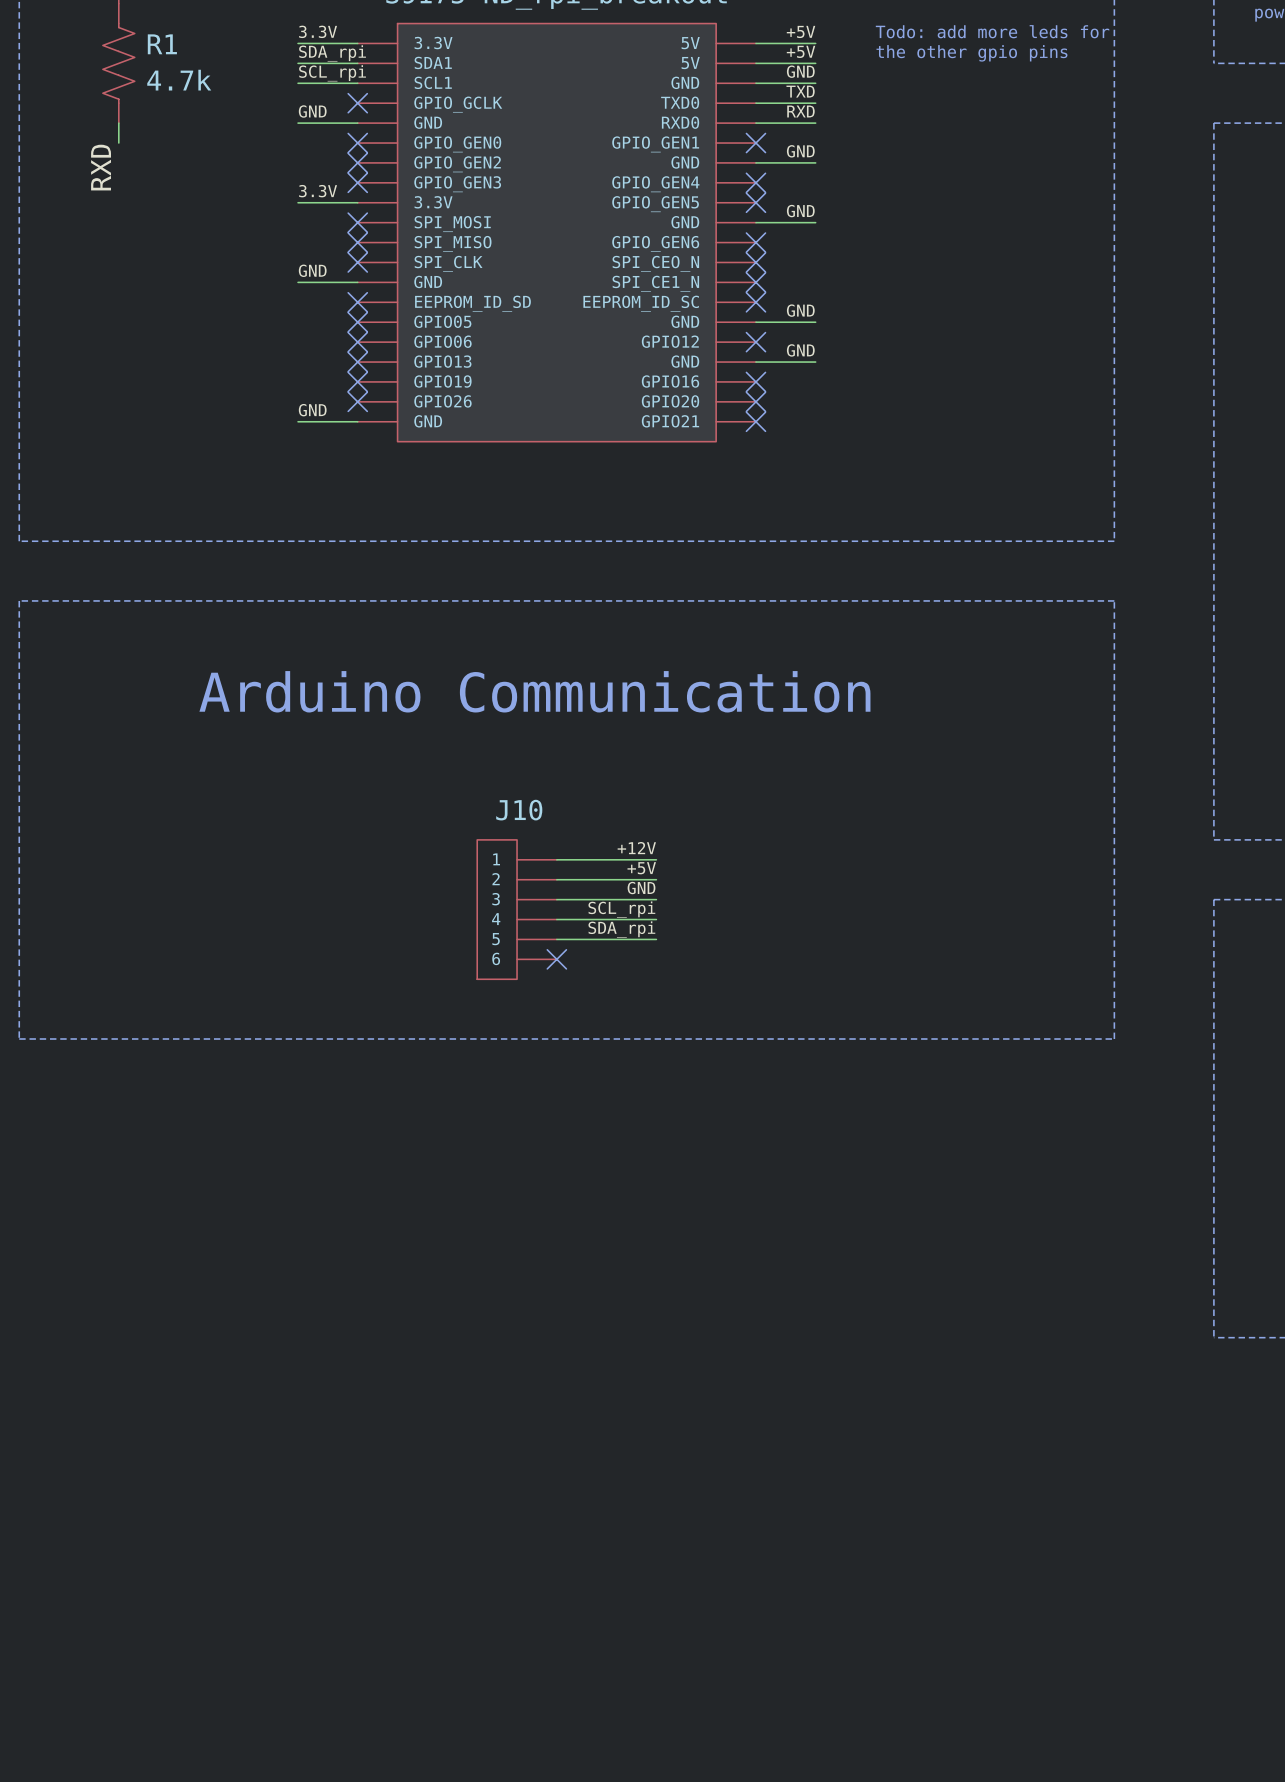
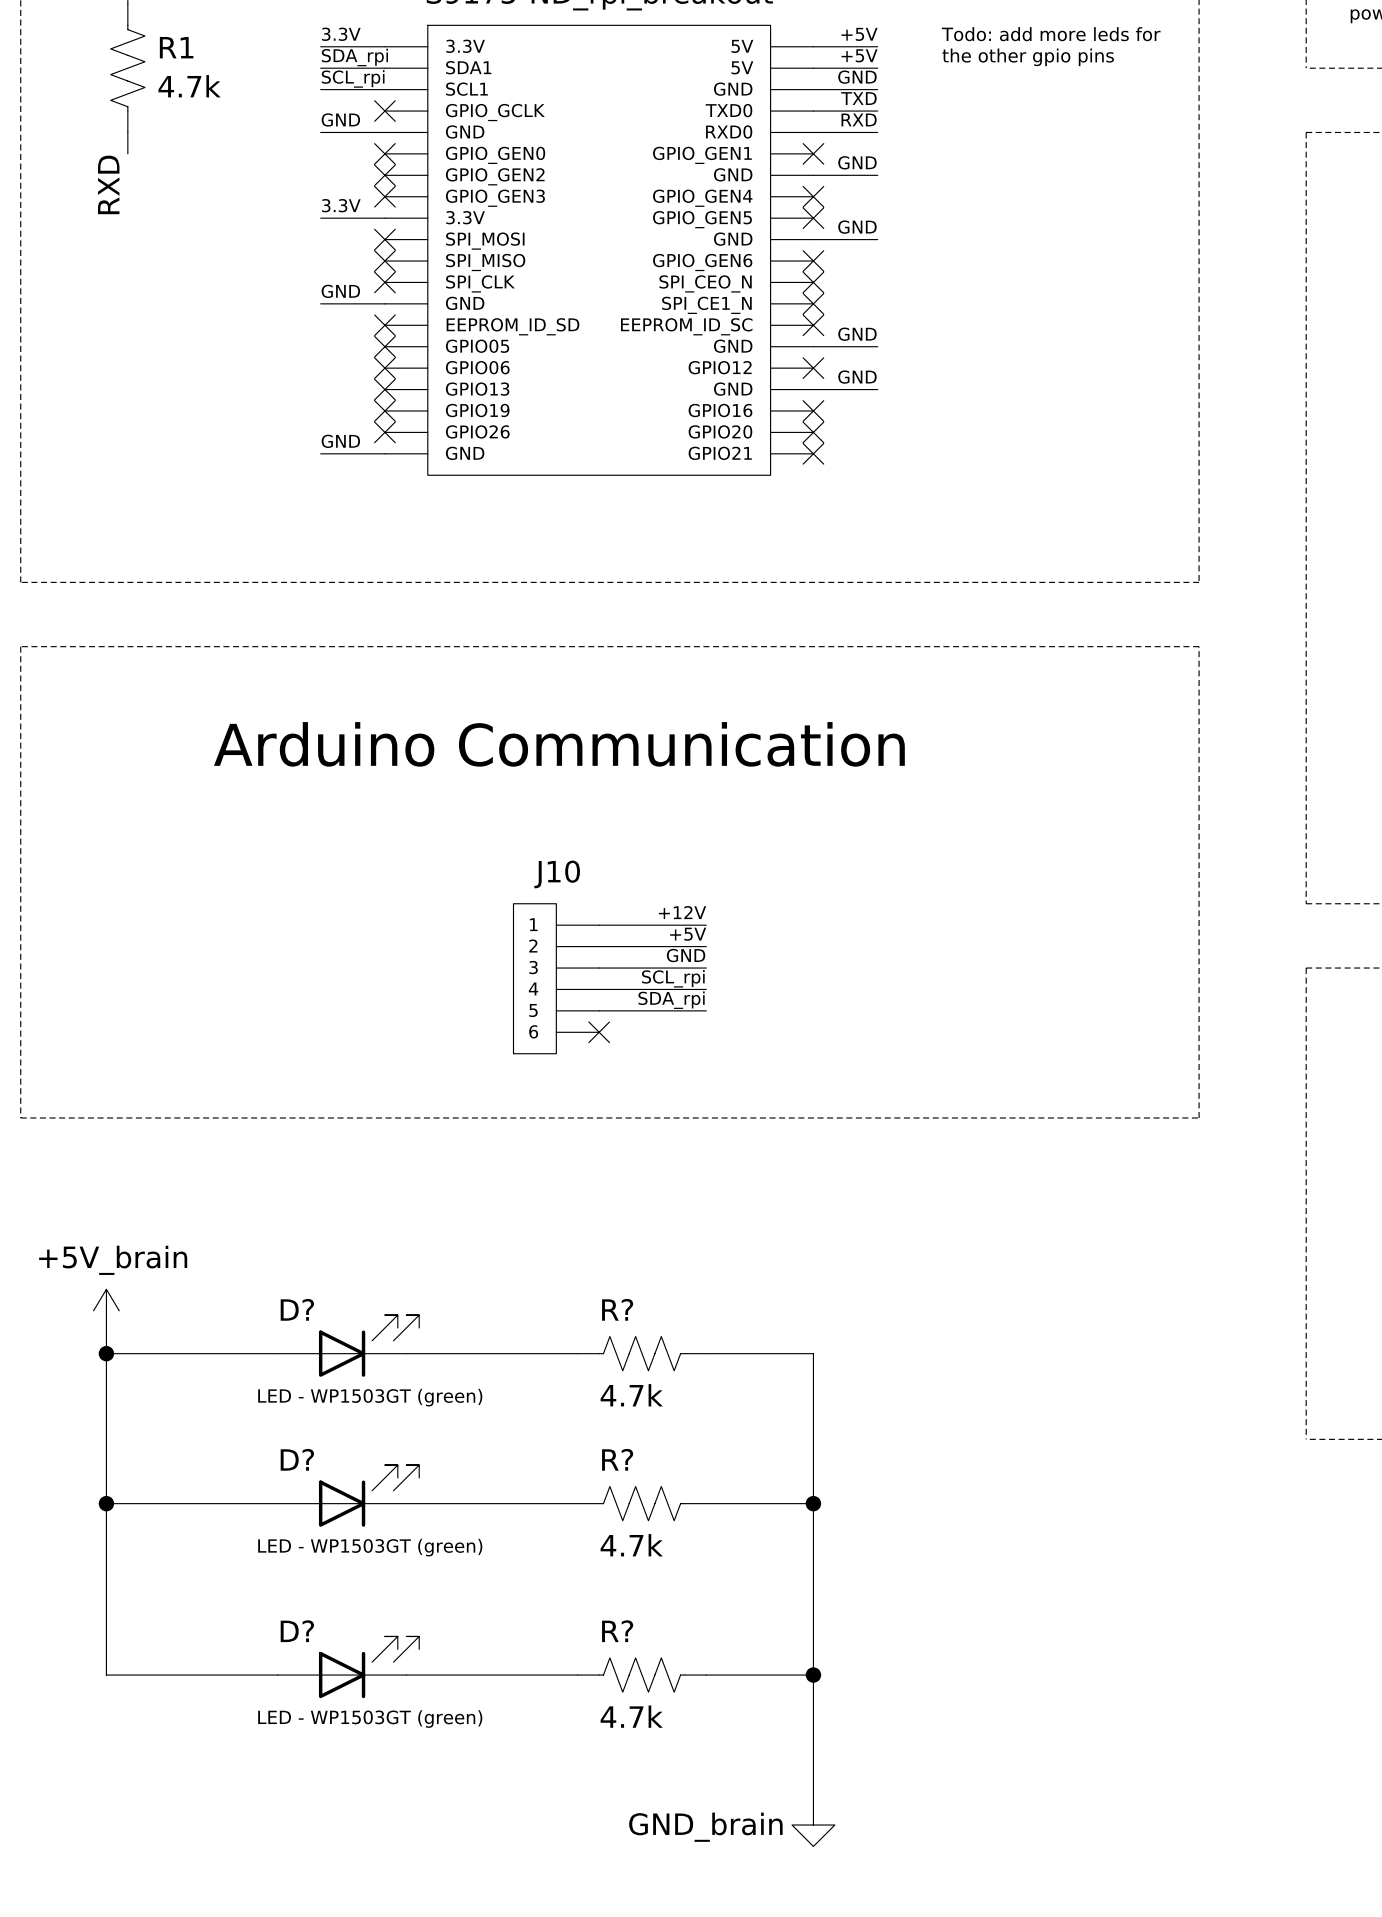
power symbol: none -> +5V_brain (106, 1310)
wire: none -> (106, 1332) (106, 1675) (277, 1675)
D?: none -> LED - WP1503GT (green) (348, 1345)
wire: none -> (106, 1353) (277, 1353)
junction: none -> (106, 1353)
wire: none -> (406, 1353) (577, 1353)
R?: none -> 4.7k (642, 1353)
wire: none -> (706, 1353) (813, 1353) (813, 1803)
D?: none -> LED - WP1503GT (green) (348, 1495)
wire: none -> (106, 1503) (277, 1503)
junction: none -> (106, 1503)
wire: none -> (406, 1503) (577, 1503)
R?: none -> 4.7k (642, 1503)
wire: none -> (706, 1503) (813, 1503)
junction: none -> (813, 1503)
D?: none -> LED - WP1503GT (green) (348, 1667)
wire: none -> (406, 1675) (577, 1675)
R?: none -> 4.7k (642, 1675)
wire: none -> (706, 1675) (813, 1675)
junction: none -> (813, 1675)
power symbol: none -> GND_brain (813, 1825)

